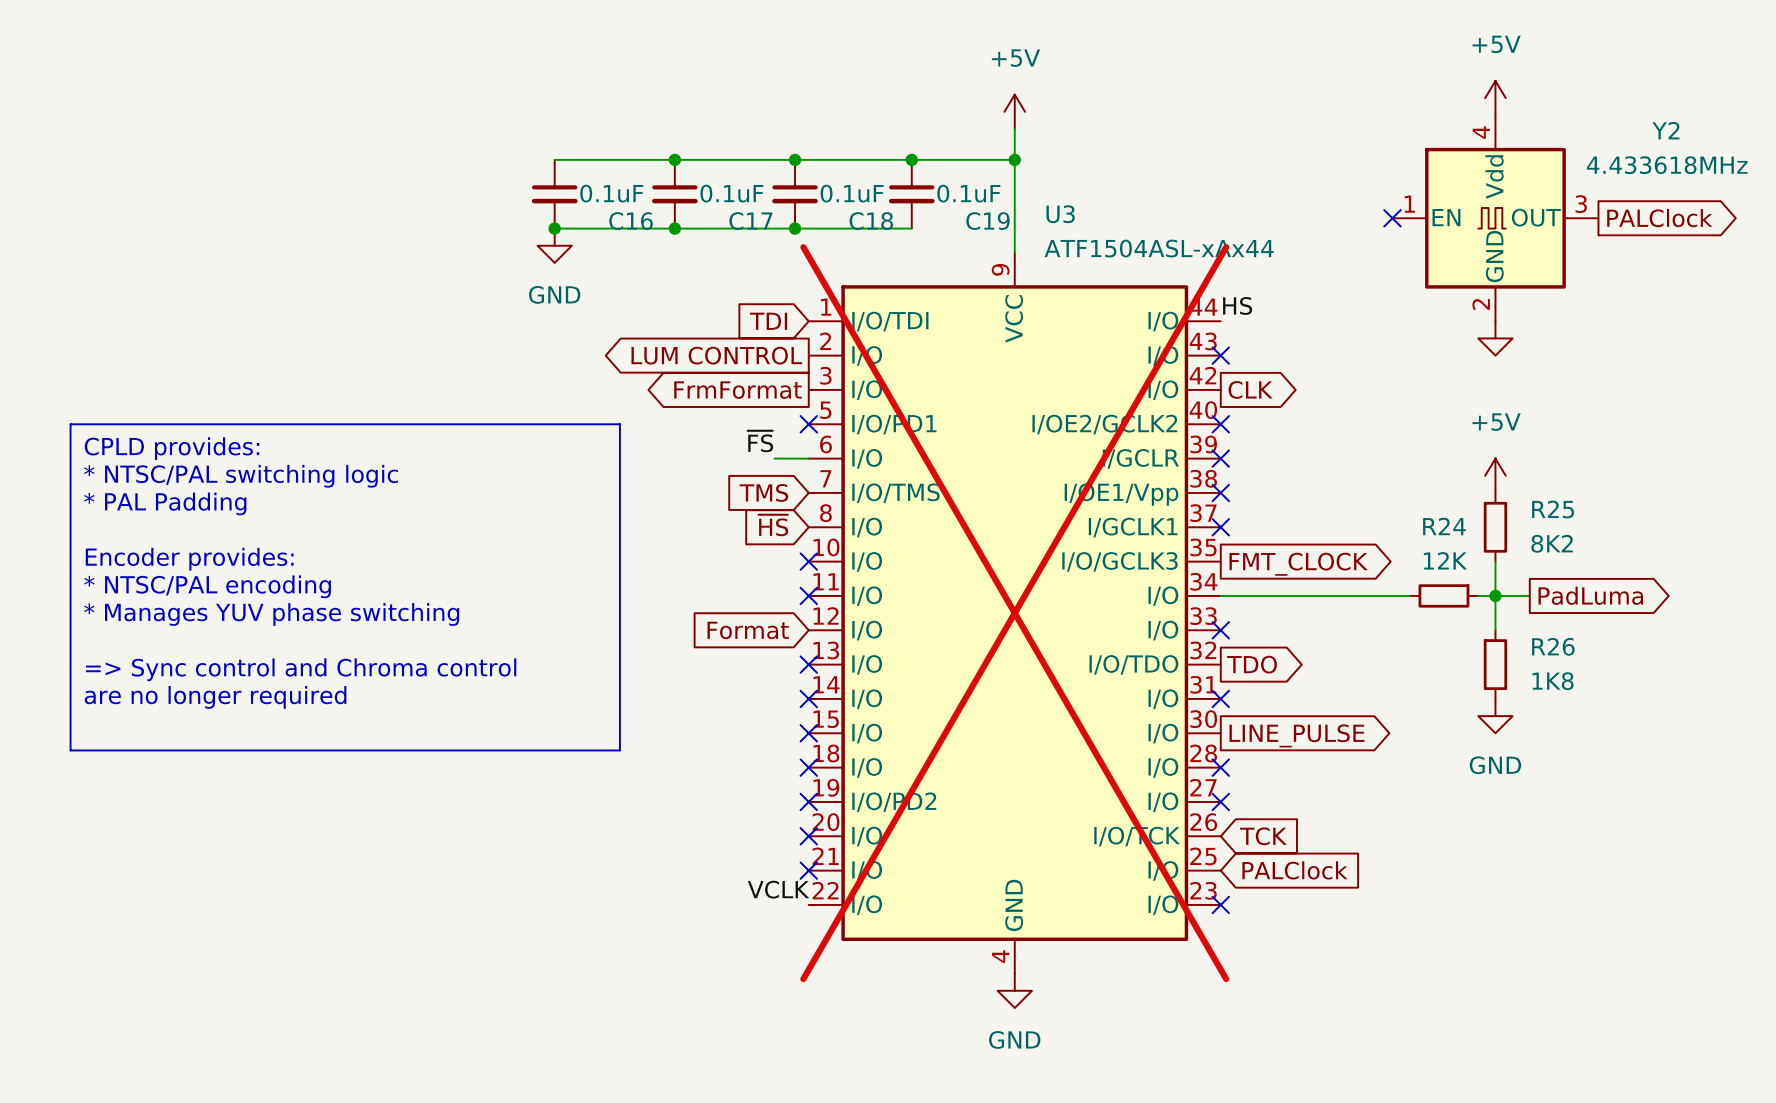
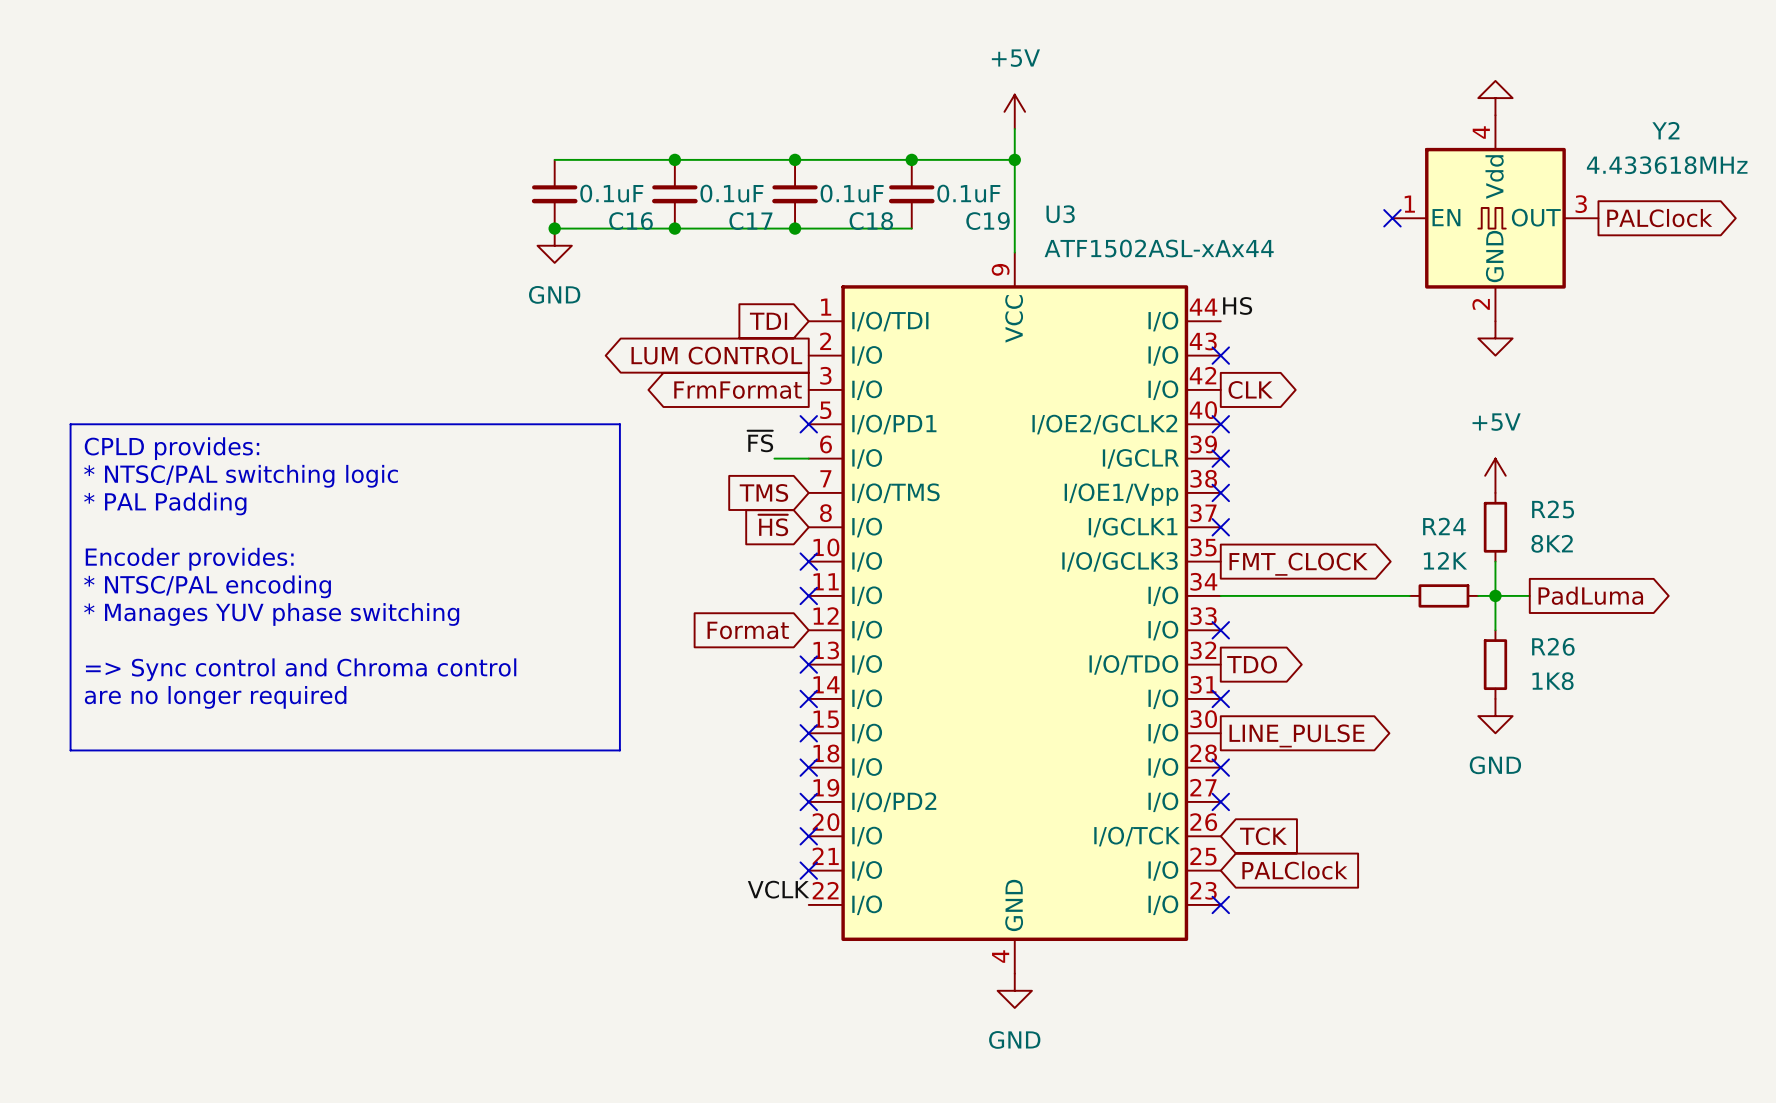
power symbol text: +5V (1496, 44) -> none
power symbol shape: [1485, 80, 1506, 116] -> [1478, 80, 1513, 116]
U3 value: ATF1504ASL-xAx44 (1159, 248) -> ATF1502ASL-xAx44 (1159, 248)
U3 do-not-place cross: (1014, 613) -> none

